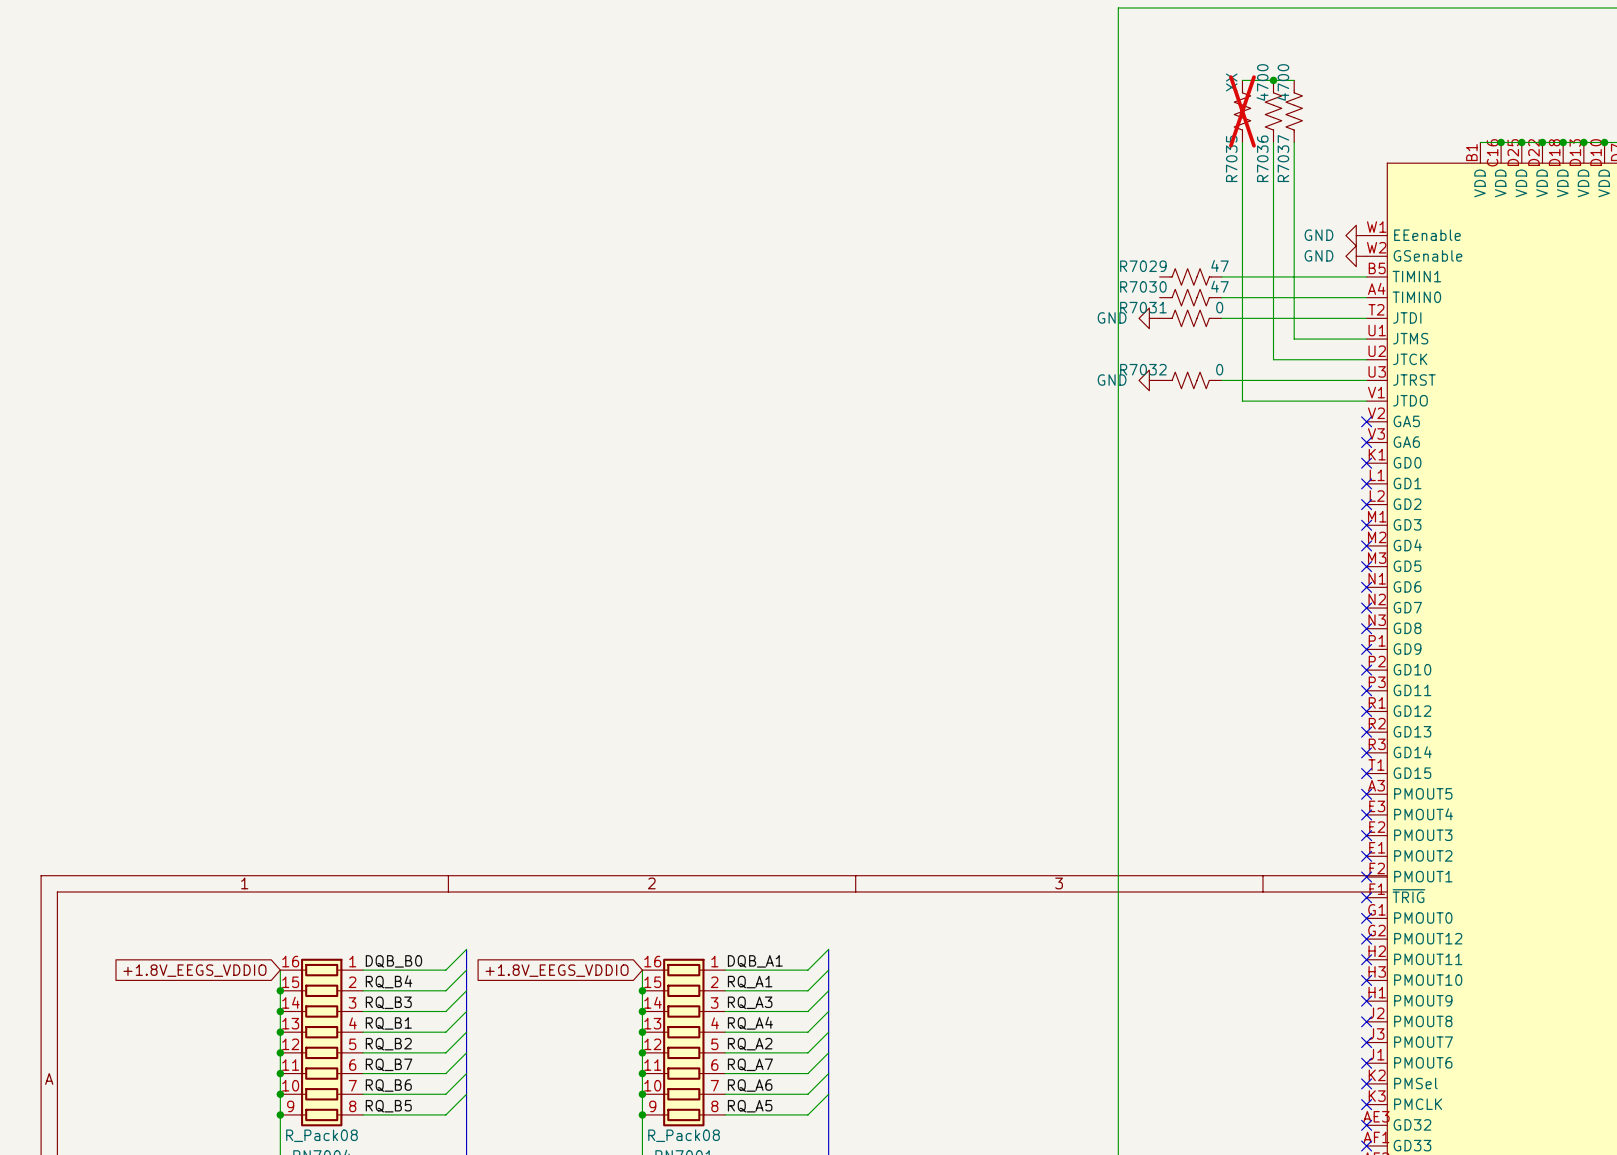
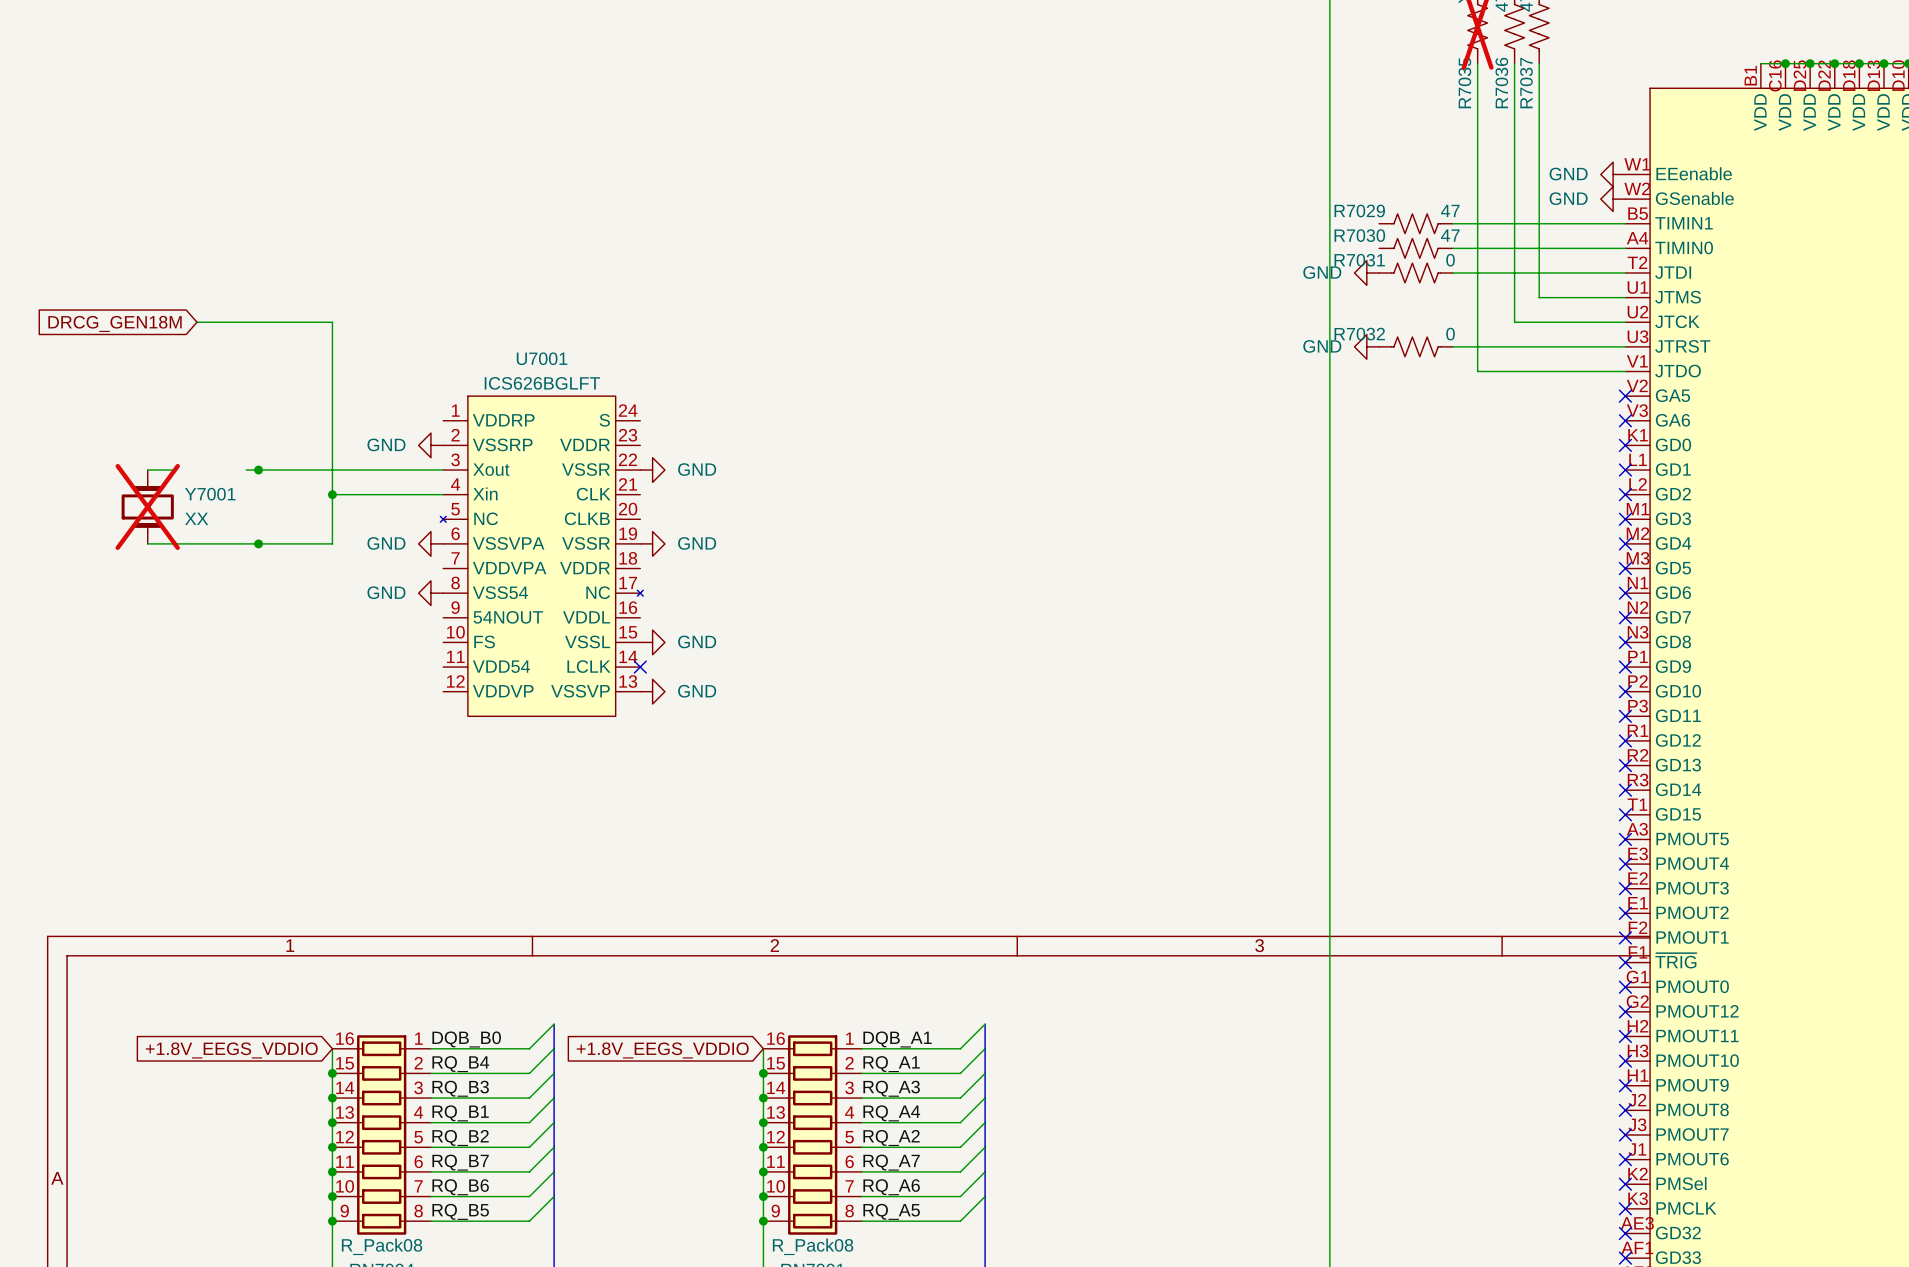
wire: none -> (196, 322) (332, 322) (332, 543) (147, 543)
global label: none -> DRCG_GEN18M (115, 323)
power symbol: none -> GND (430, 445)
wire: none -> (147, 470) (172, 470)
wire: none -> (246, 470) (443, 470)
junction: none -> (258, 470)
power symbol: none -> GND (652, 470)
wire: none -> (332, 494) (443, 494)
junction: none -> (332, 494)
Y7001: none -> XX (147, 506)
junction: none -> (258, 543)
power symbol: none -> GND (430, 543)
power symbol: none -> GND (652, 543)
U7001: none -> ICS626BGLFT (541, 556)
power symbol: none -> GND (430, 593)
power symbol: none -> GND (652, 642)
no-connect mark: none -> (640, 667)
power symbol: none -> GND (652, 691)

